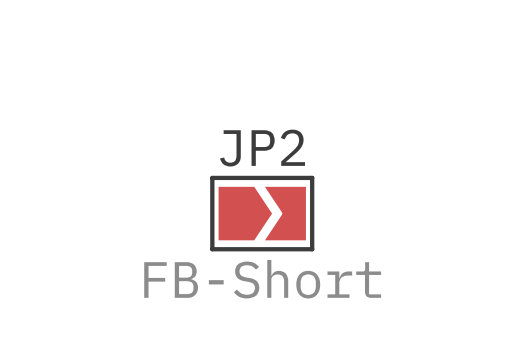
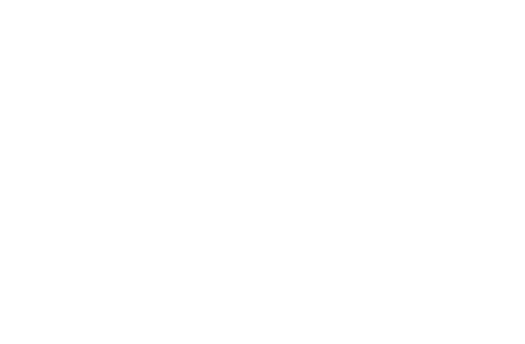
JP2: FB-Short (262, 213) -> none

